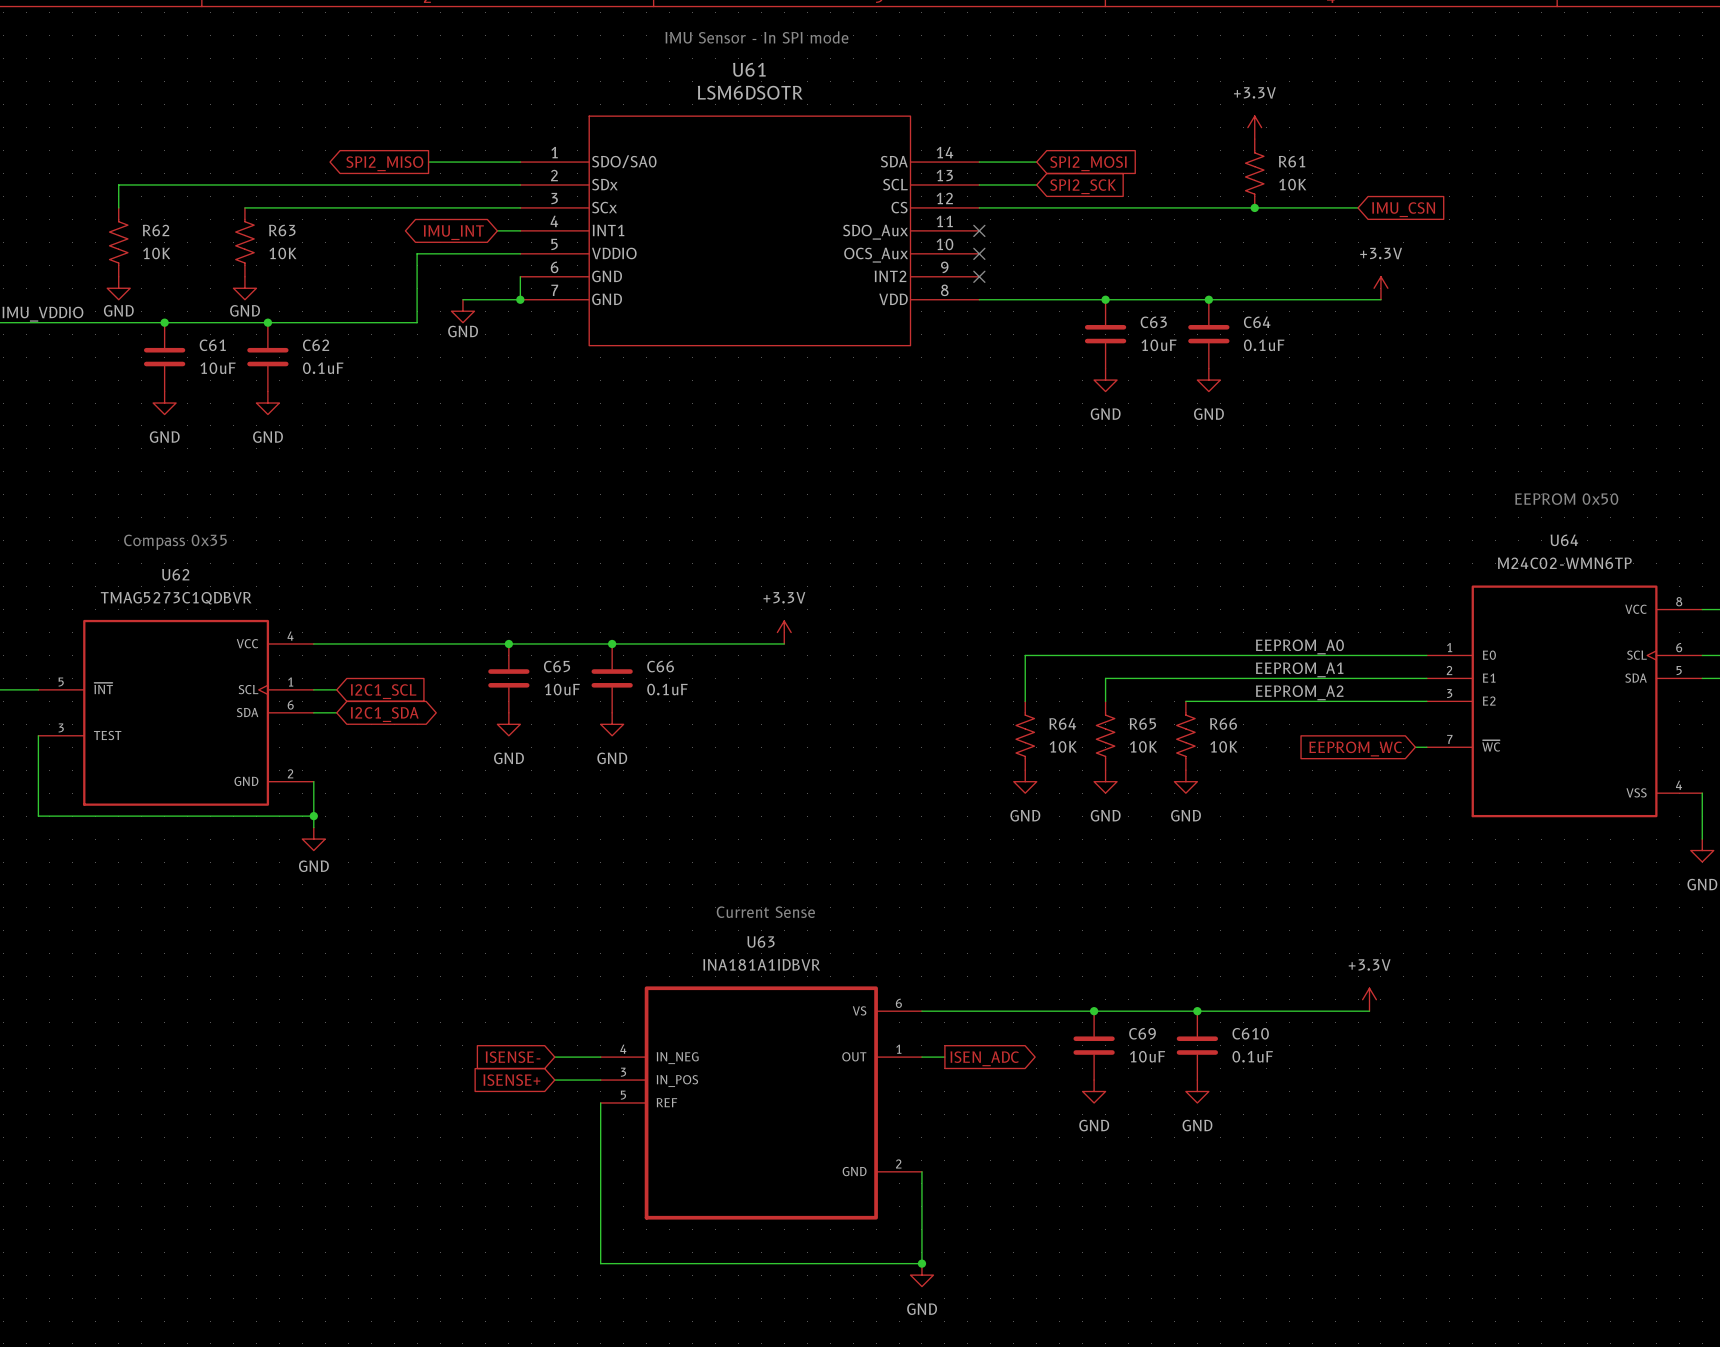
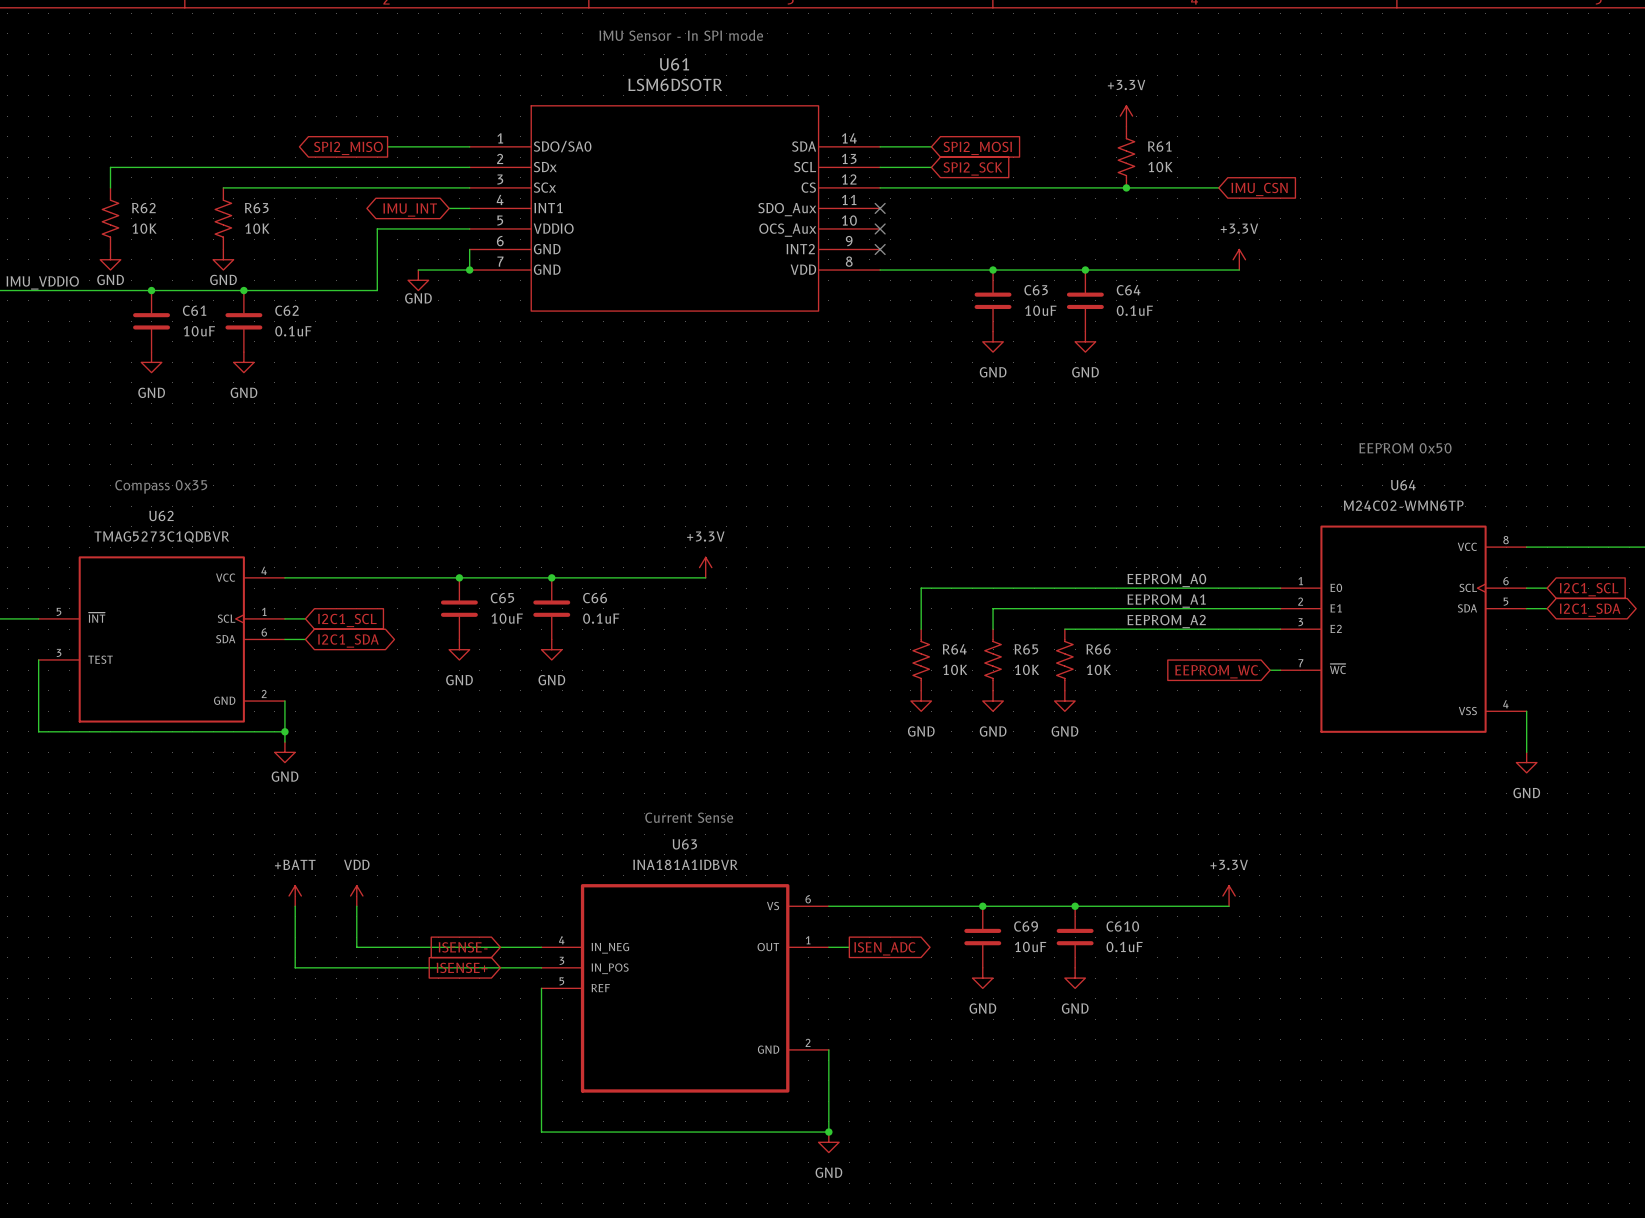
power symbol: none -> +BATT (295, 896)
power symbol: none -> VDD (356, 896)
wire: none -> (295, 906) (295, 967) (500, 967)
wire: none -> (356, 906) (356, 947) (500, 947)

